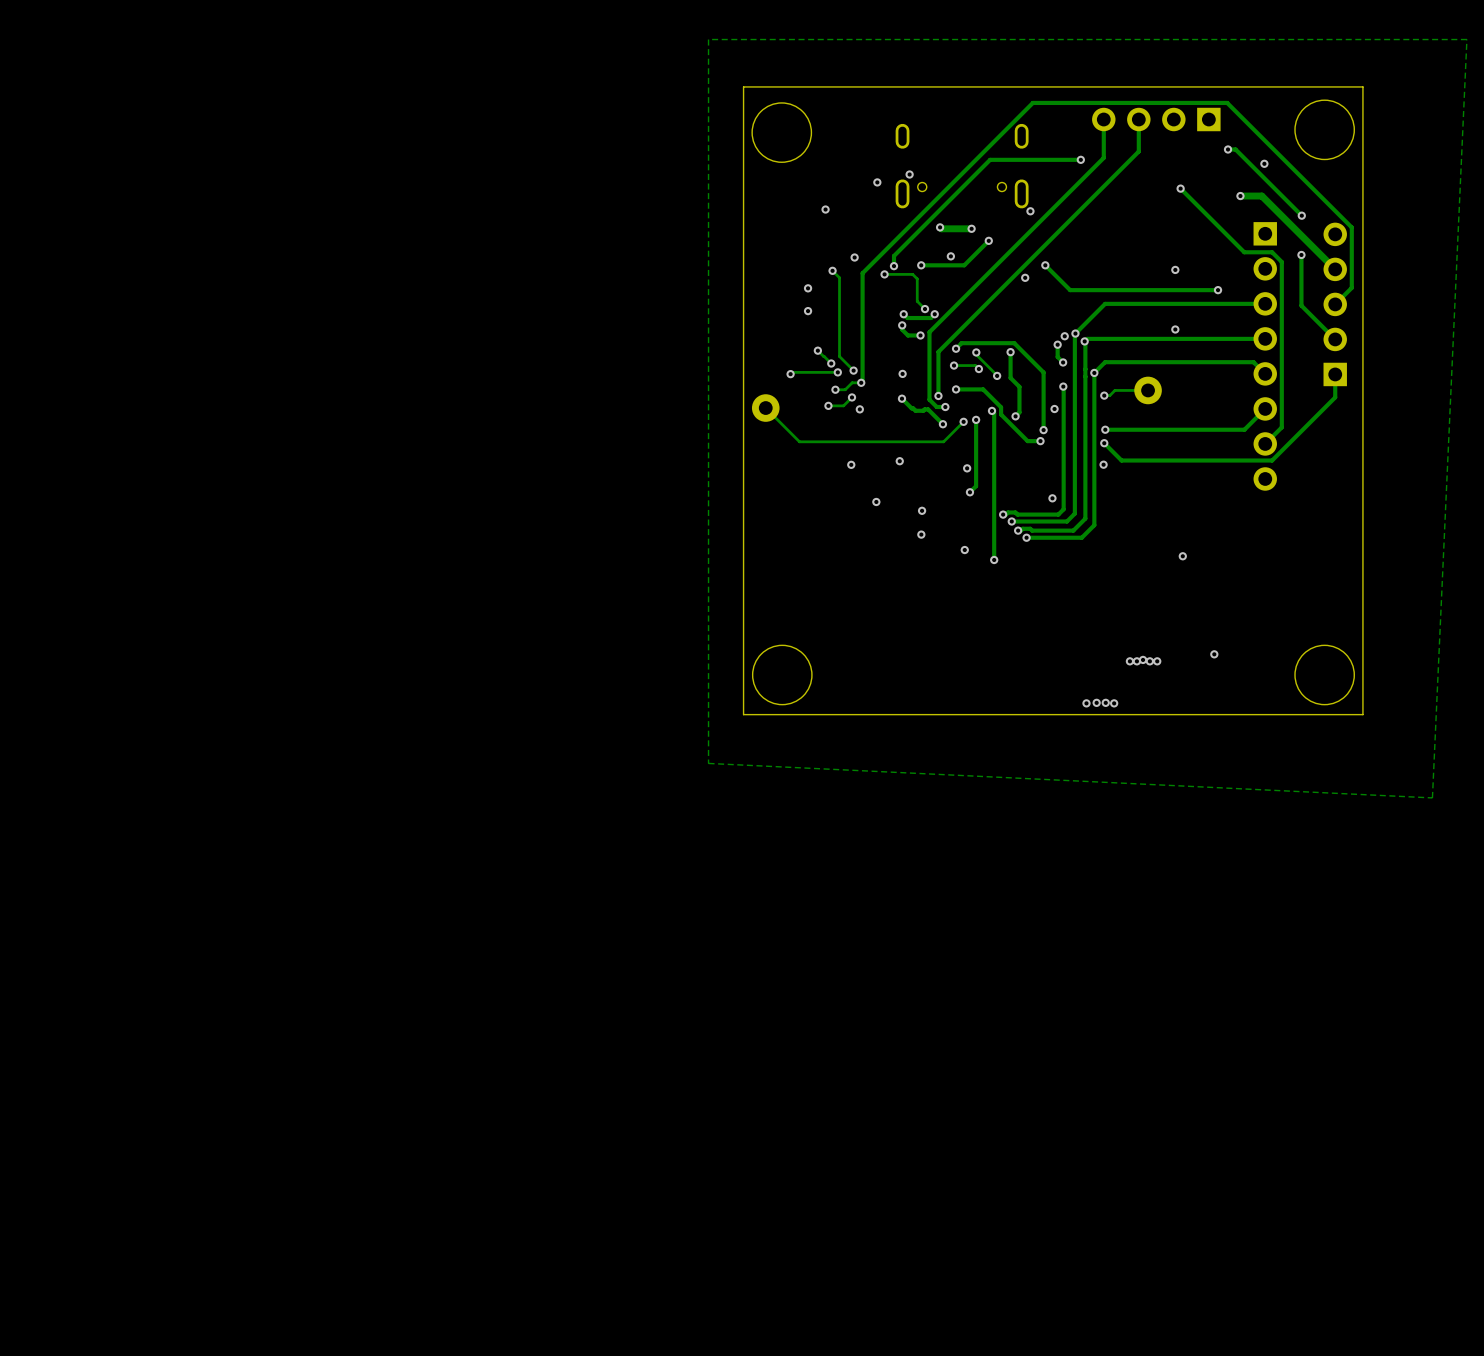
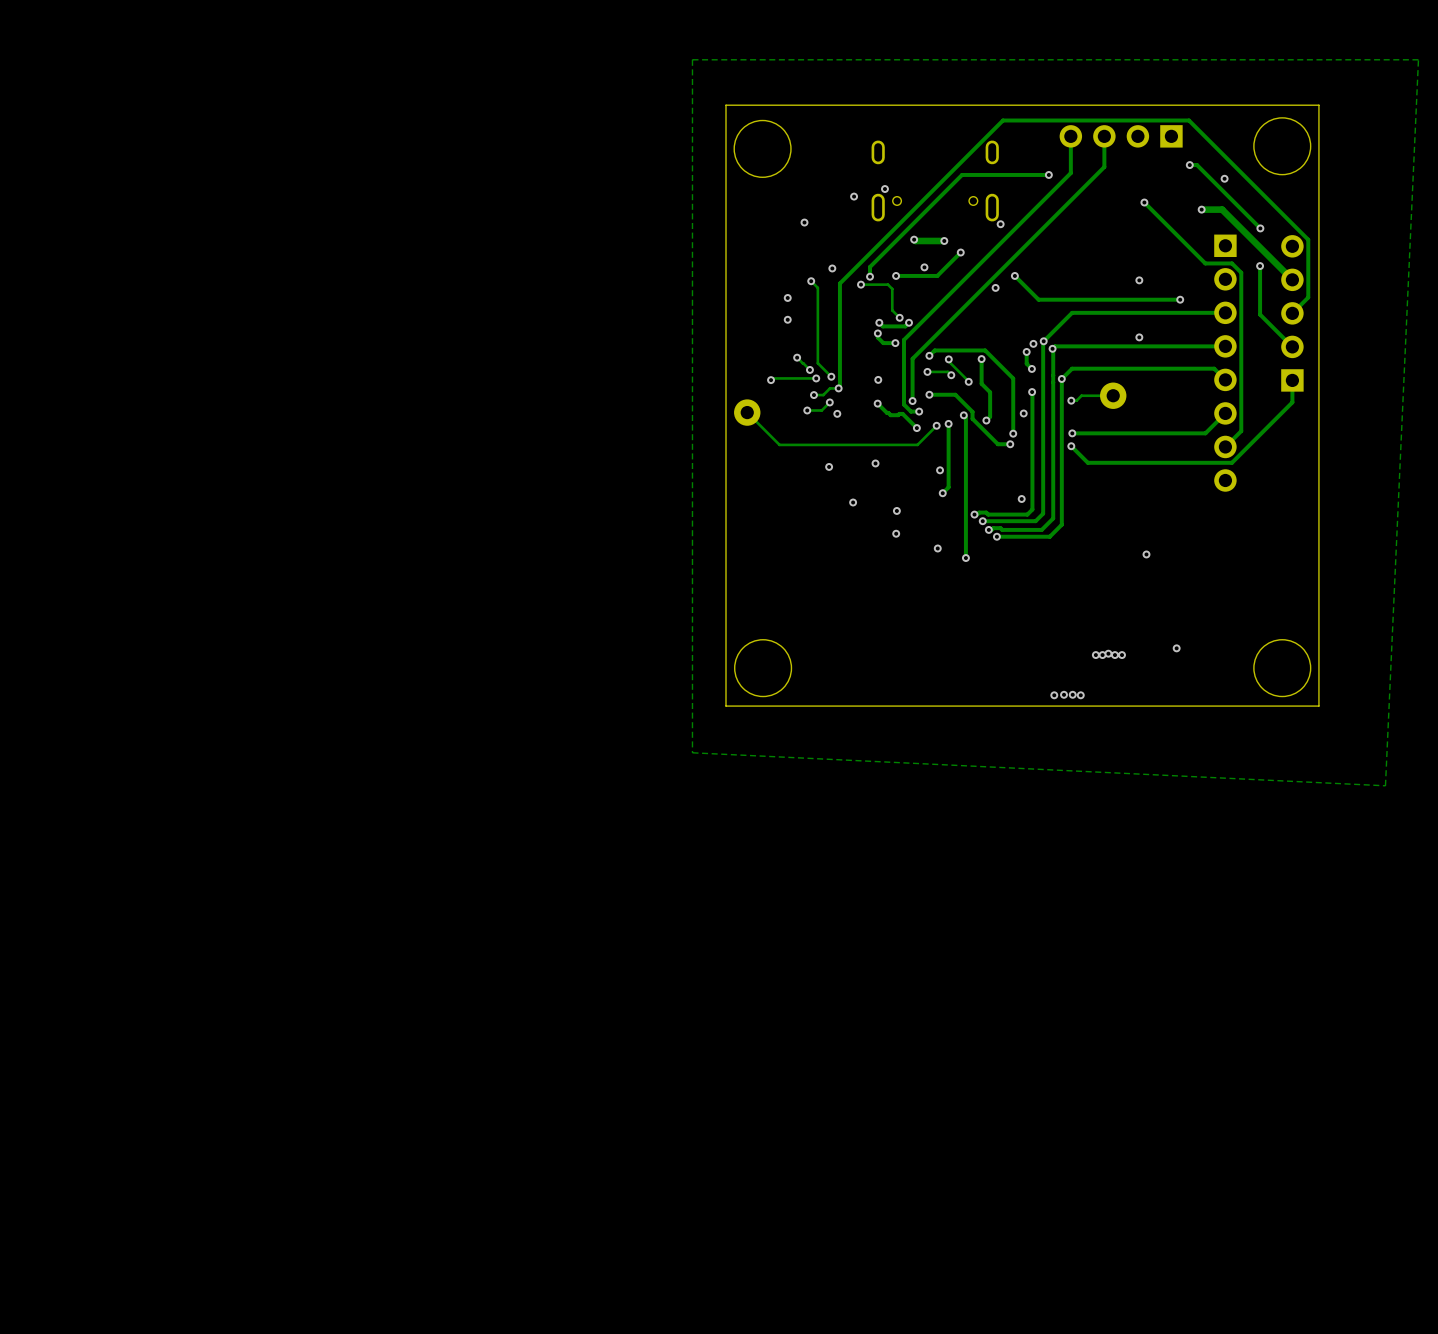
via: (1103, 464) -> none

